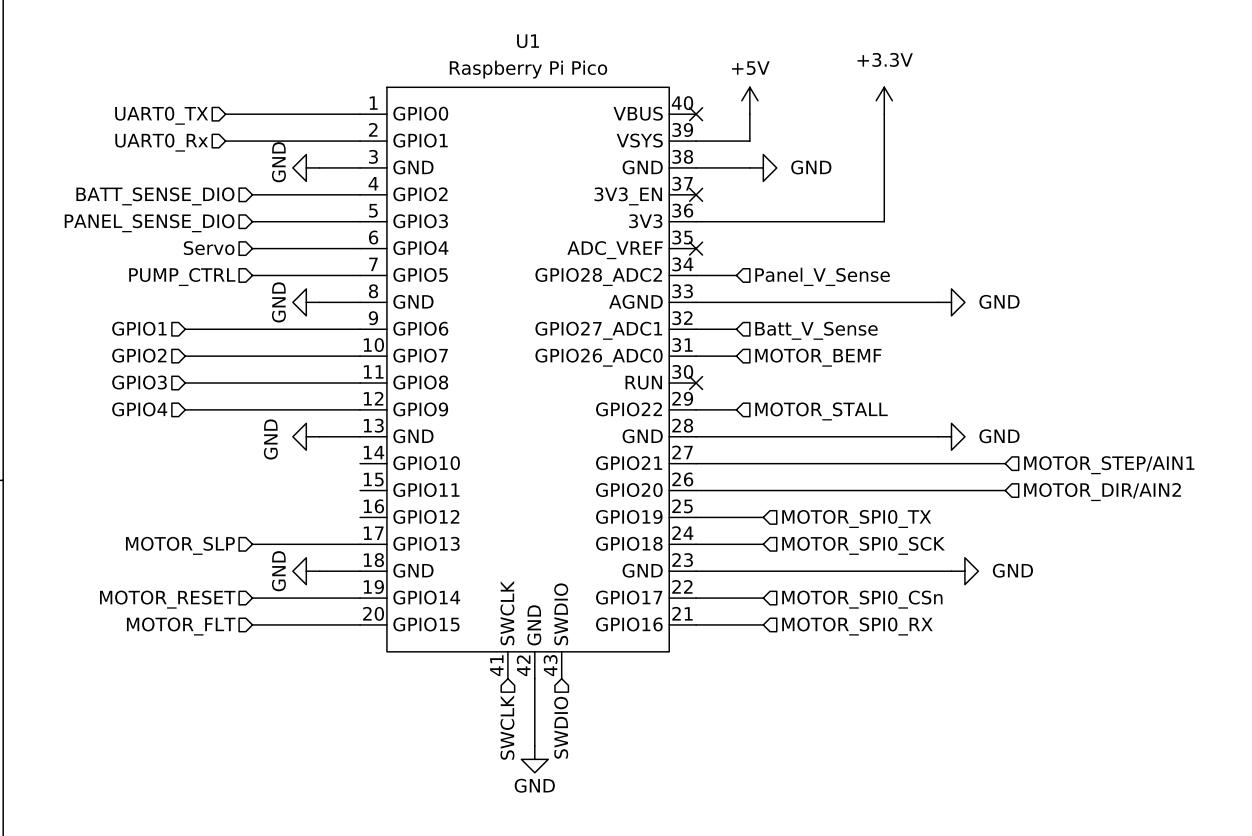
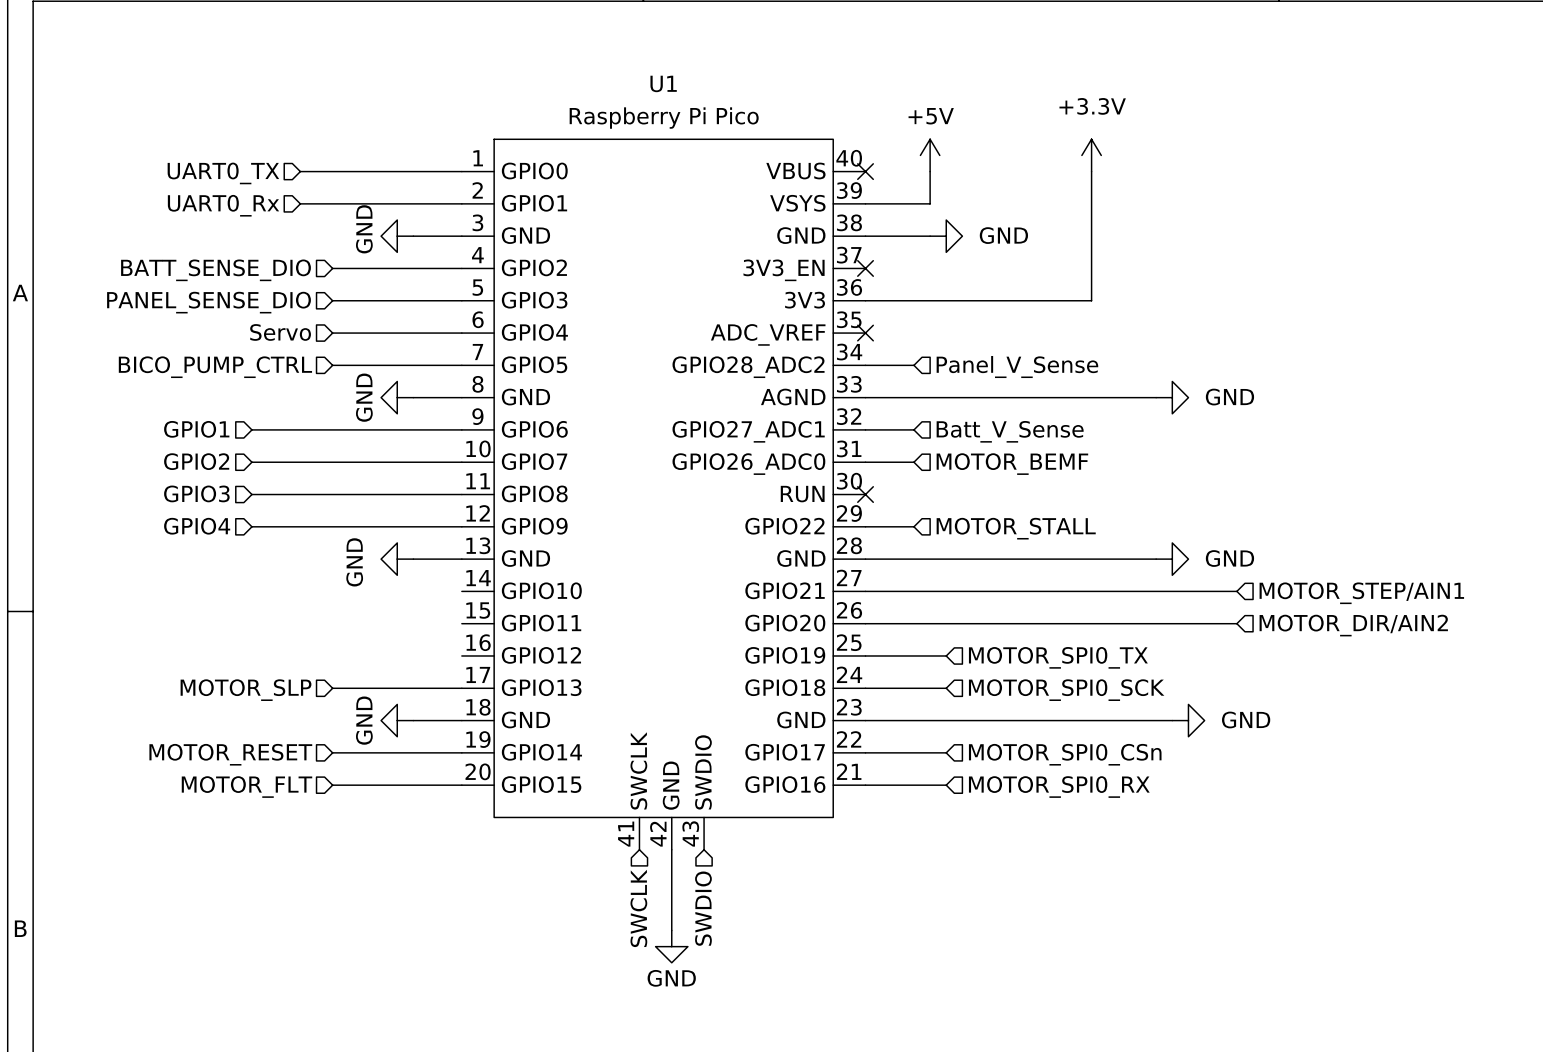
hierarchical label: PUMP_CTRL (182, 277) -> BICO_PUMP_CTRL (215, 367)

